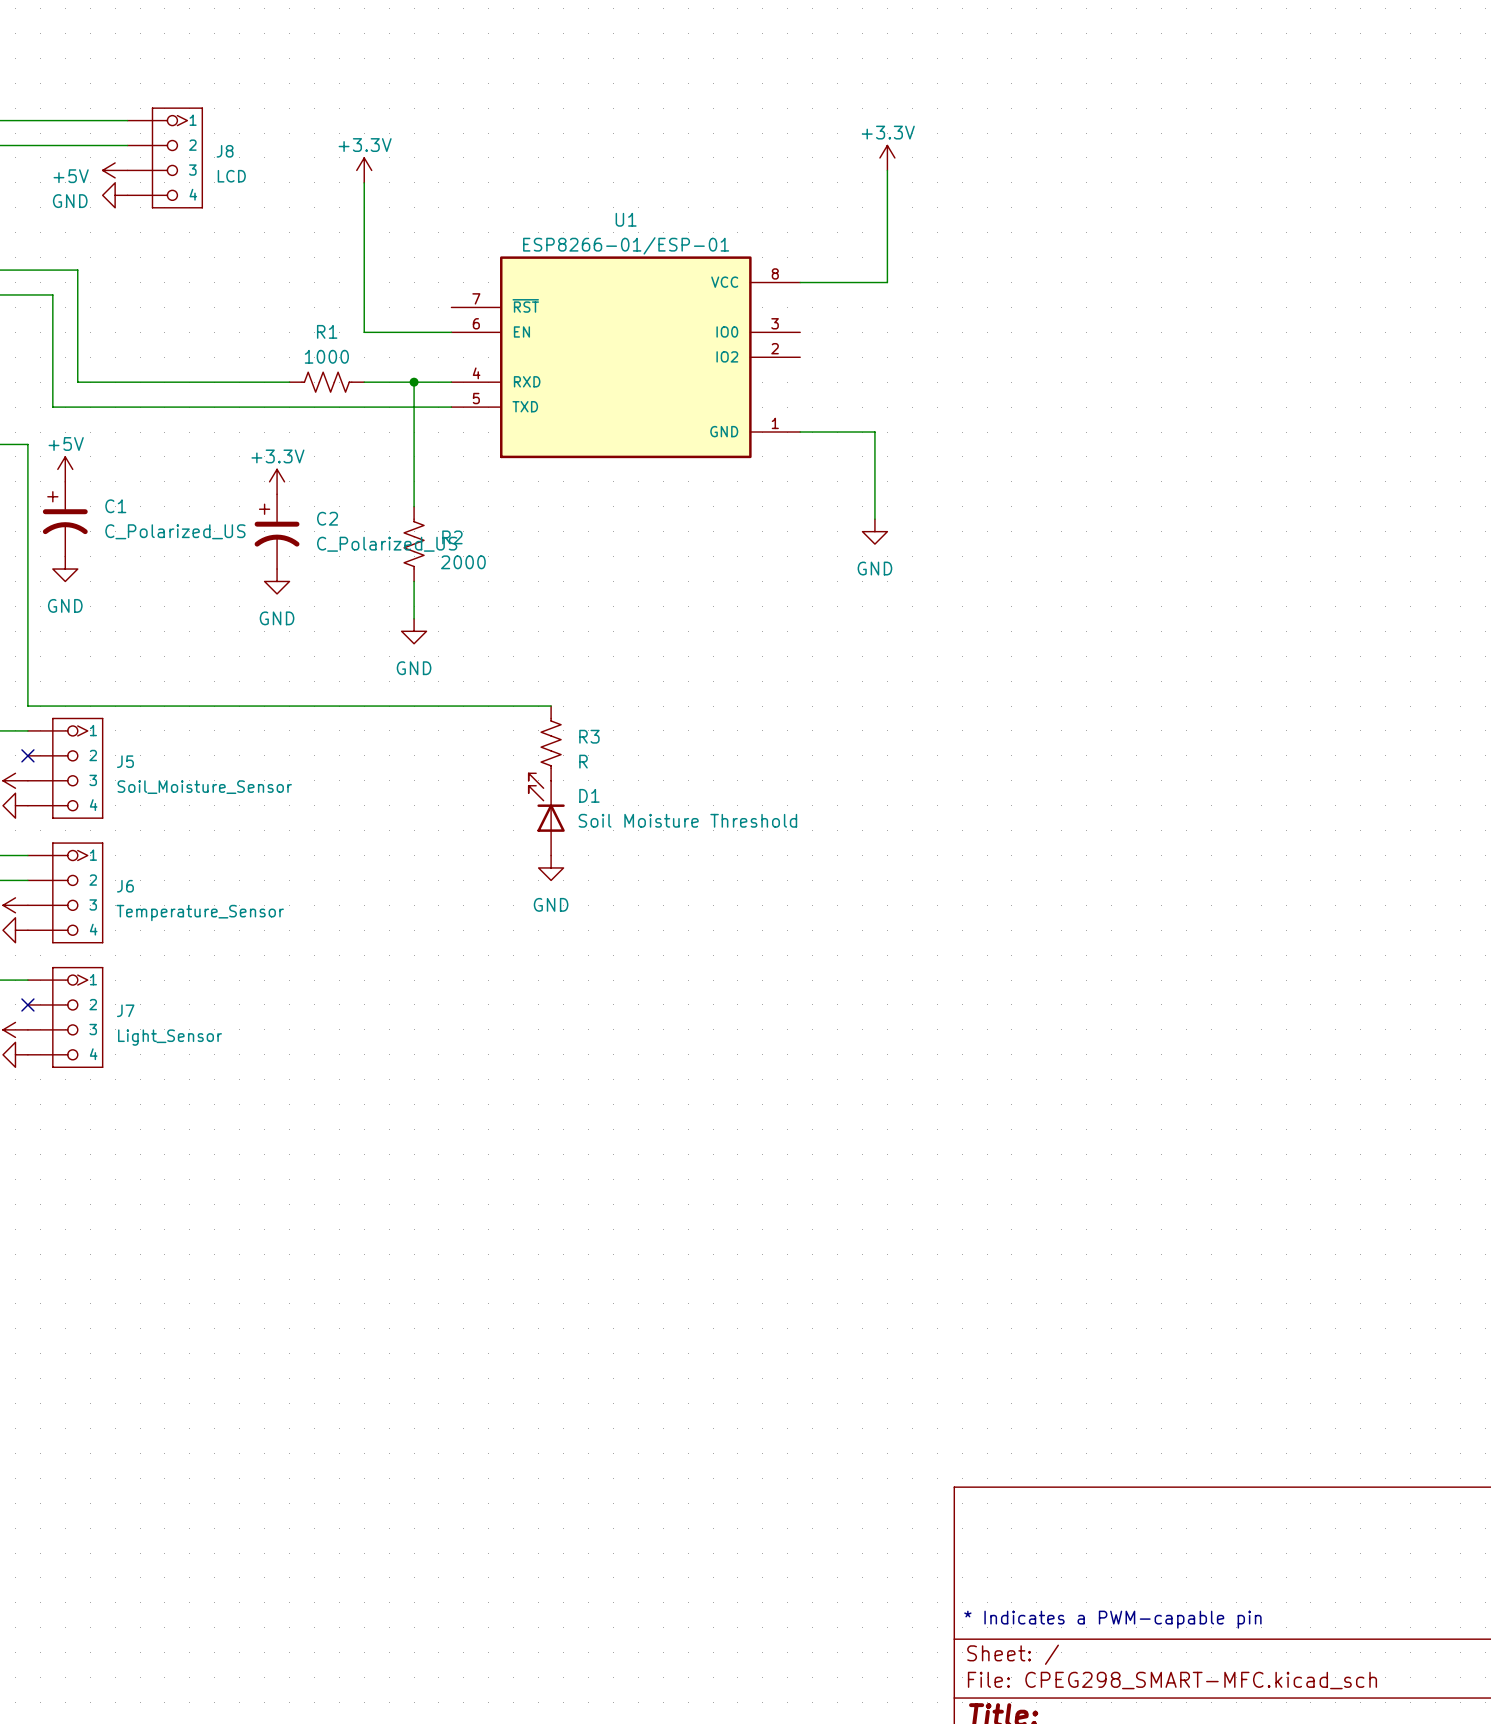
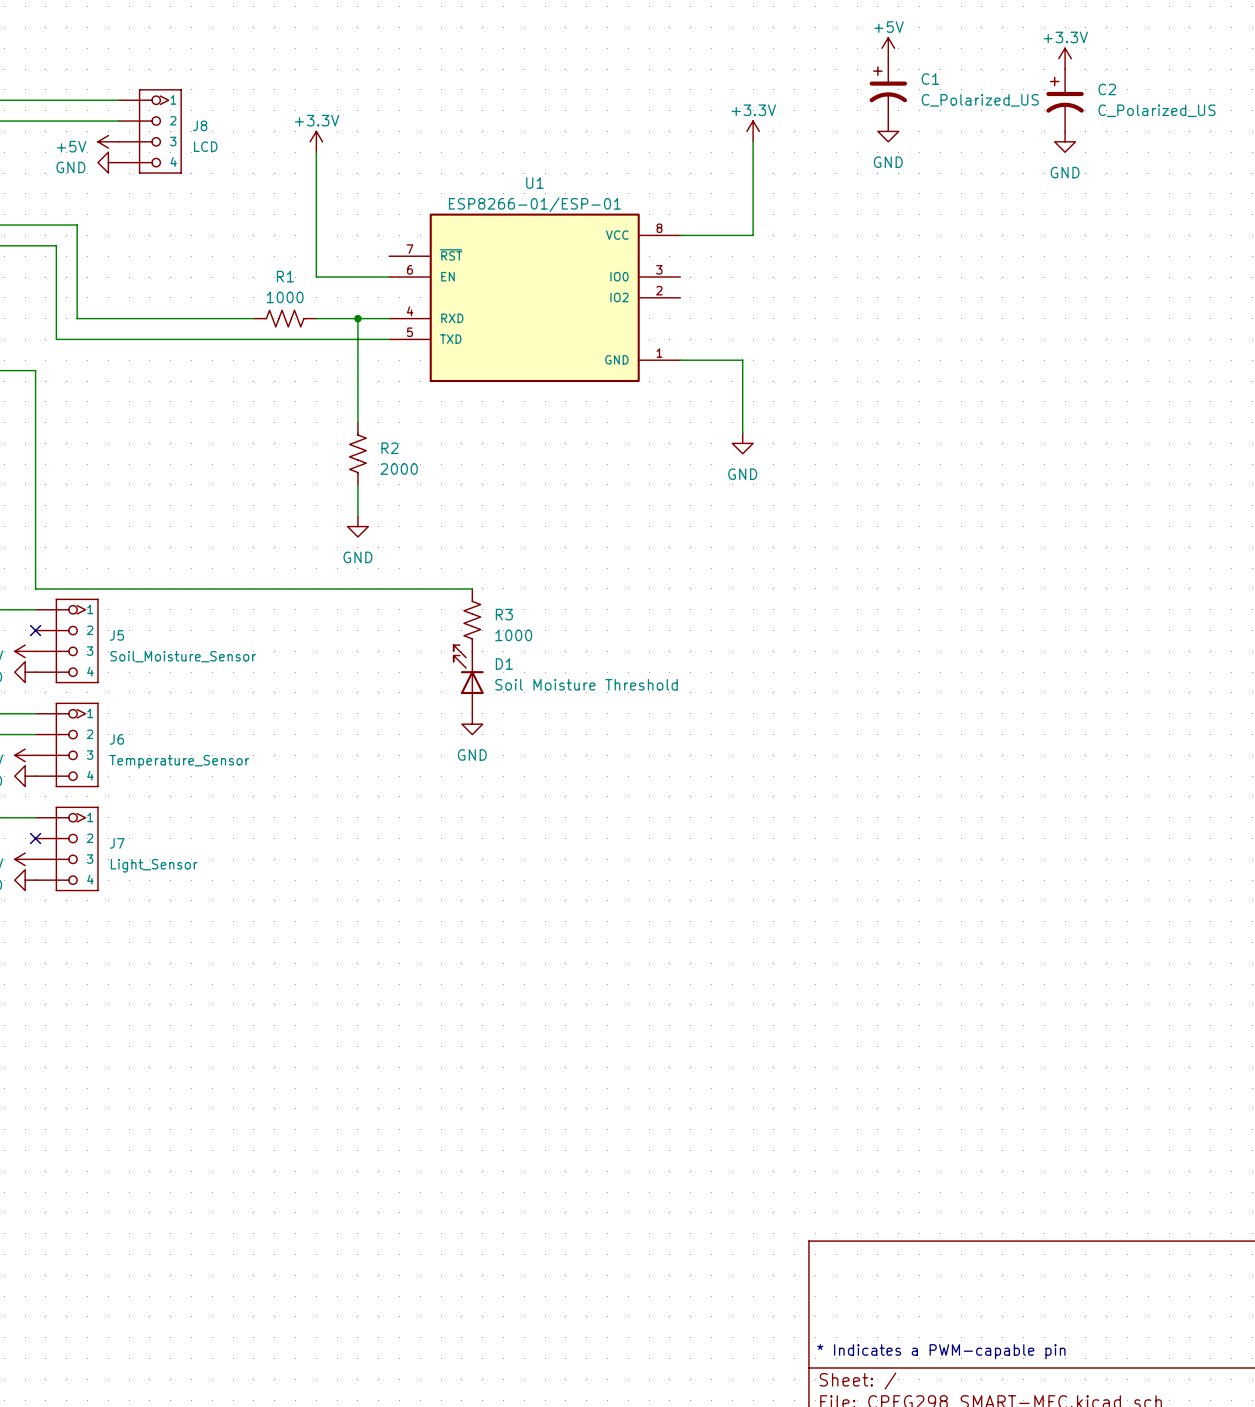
power symbol: none -> +5V (888, 48)
power symbol: none -> +3.3V (1065, 58)
power symbol: none -> GND (888, 131)
power symbol: none -> GND (1065, 141)
power symbol: +5V (65, 469) -> none
power symbol: +3.3V (277, 481) -> none
C1 position: (65, 519) -> (888, 89)
C2 position: (277, 531) -> (1065, 100)
power symbol: GND (65, 569) -> none
power symbol: GND (277, 581) -> none
R3 value: R (583, 761) -> 1000 (513, 635)

